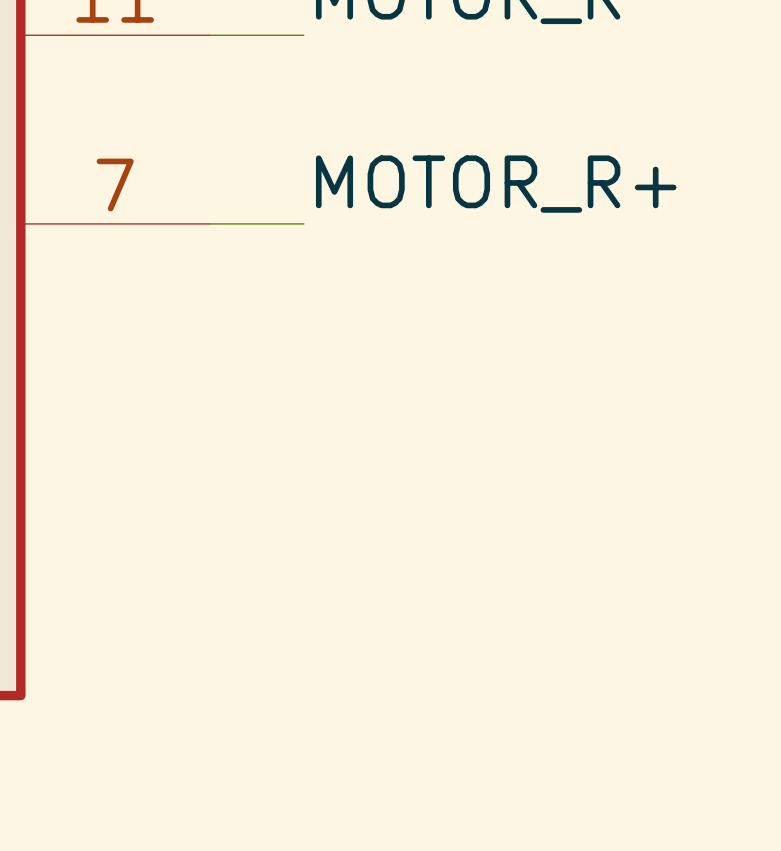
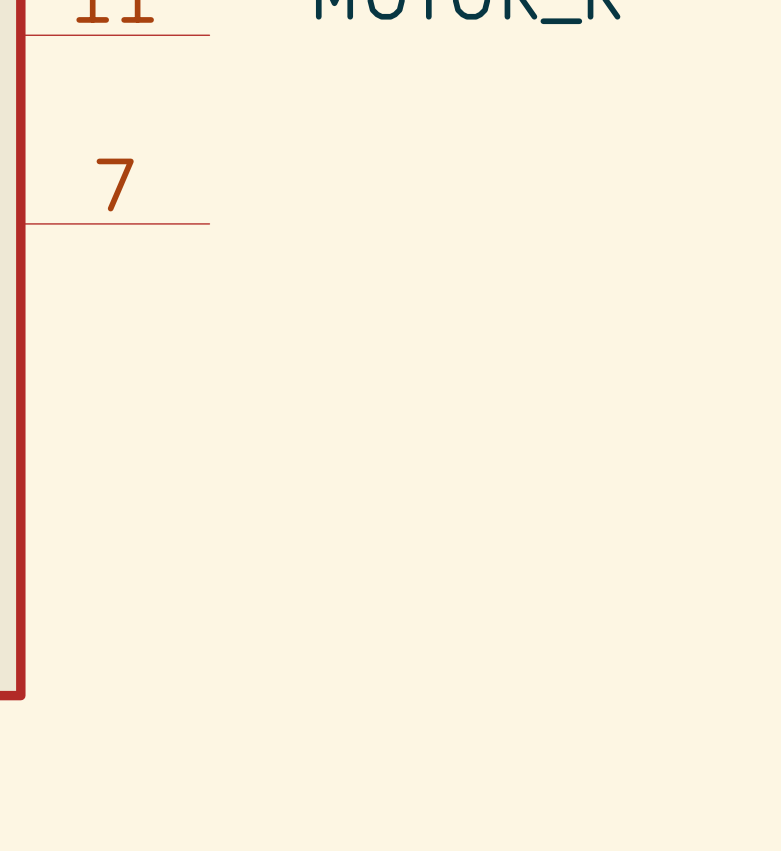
wire: (209, 35) (303, 35) -> none
label: MOTOR_R+ (496, 184) -> none
wire: (209, 223) (303, 223) -> none

